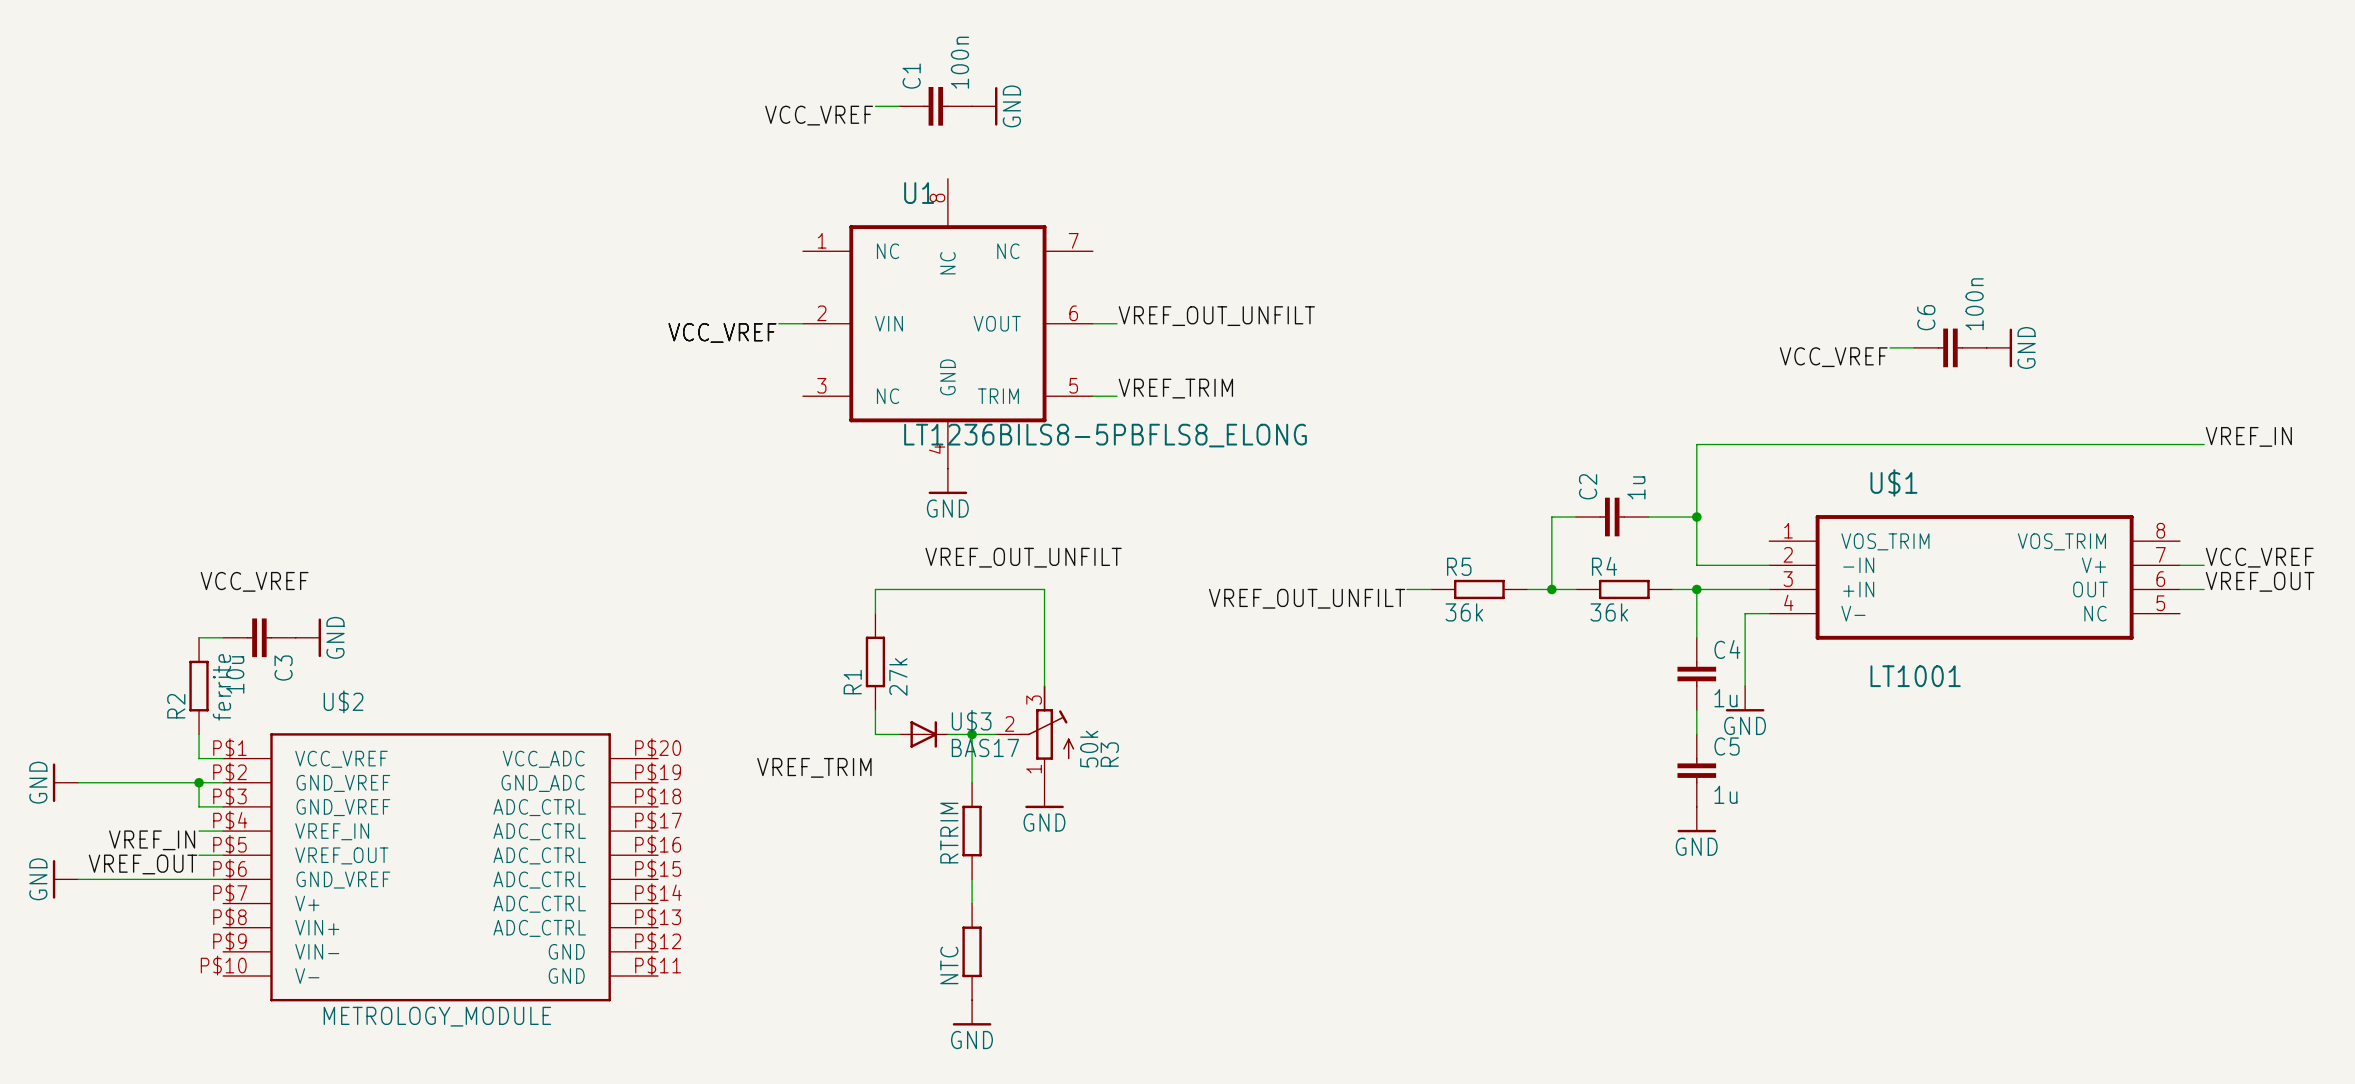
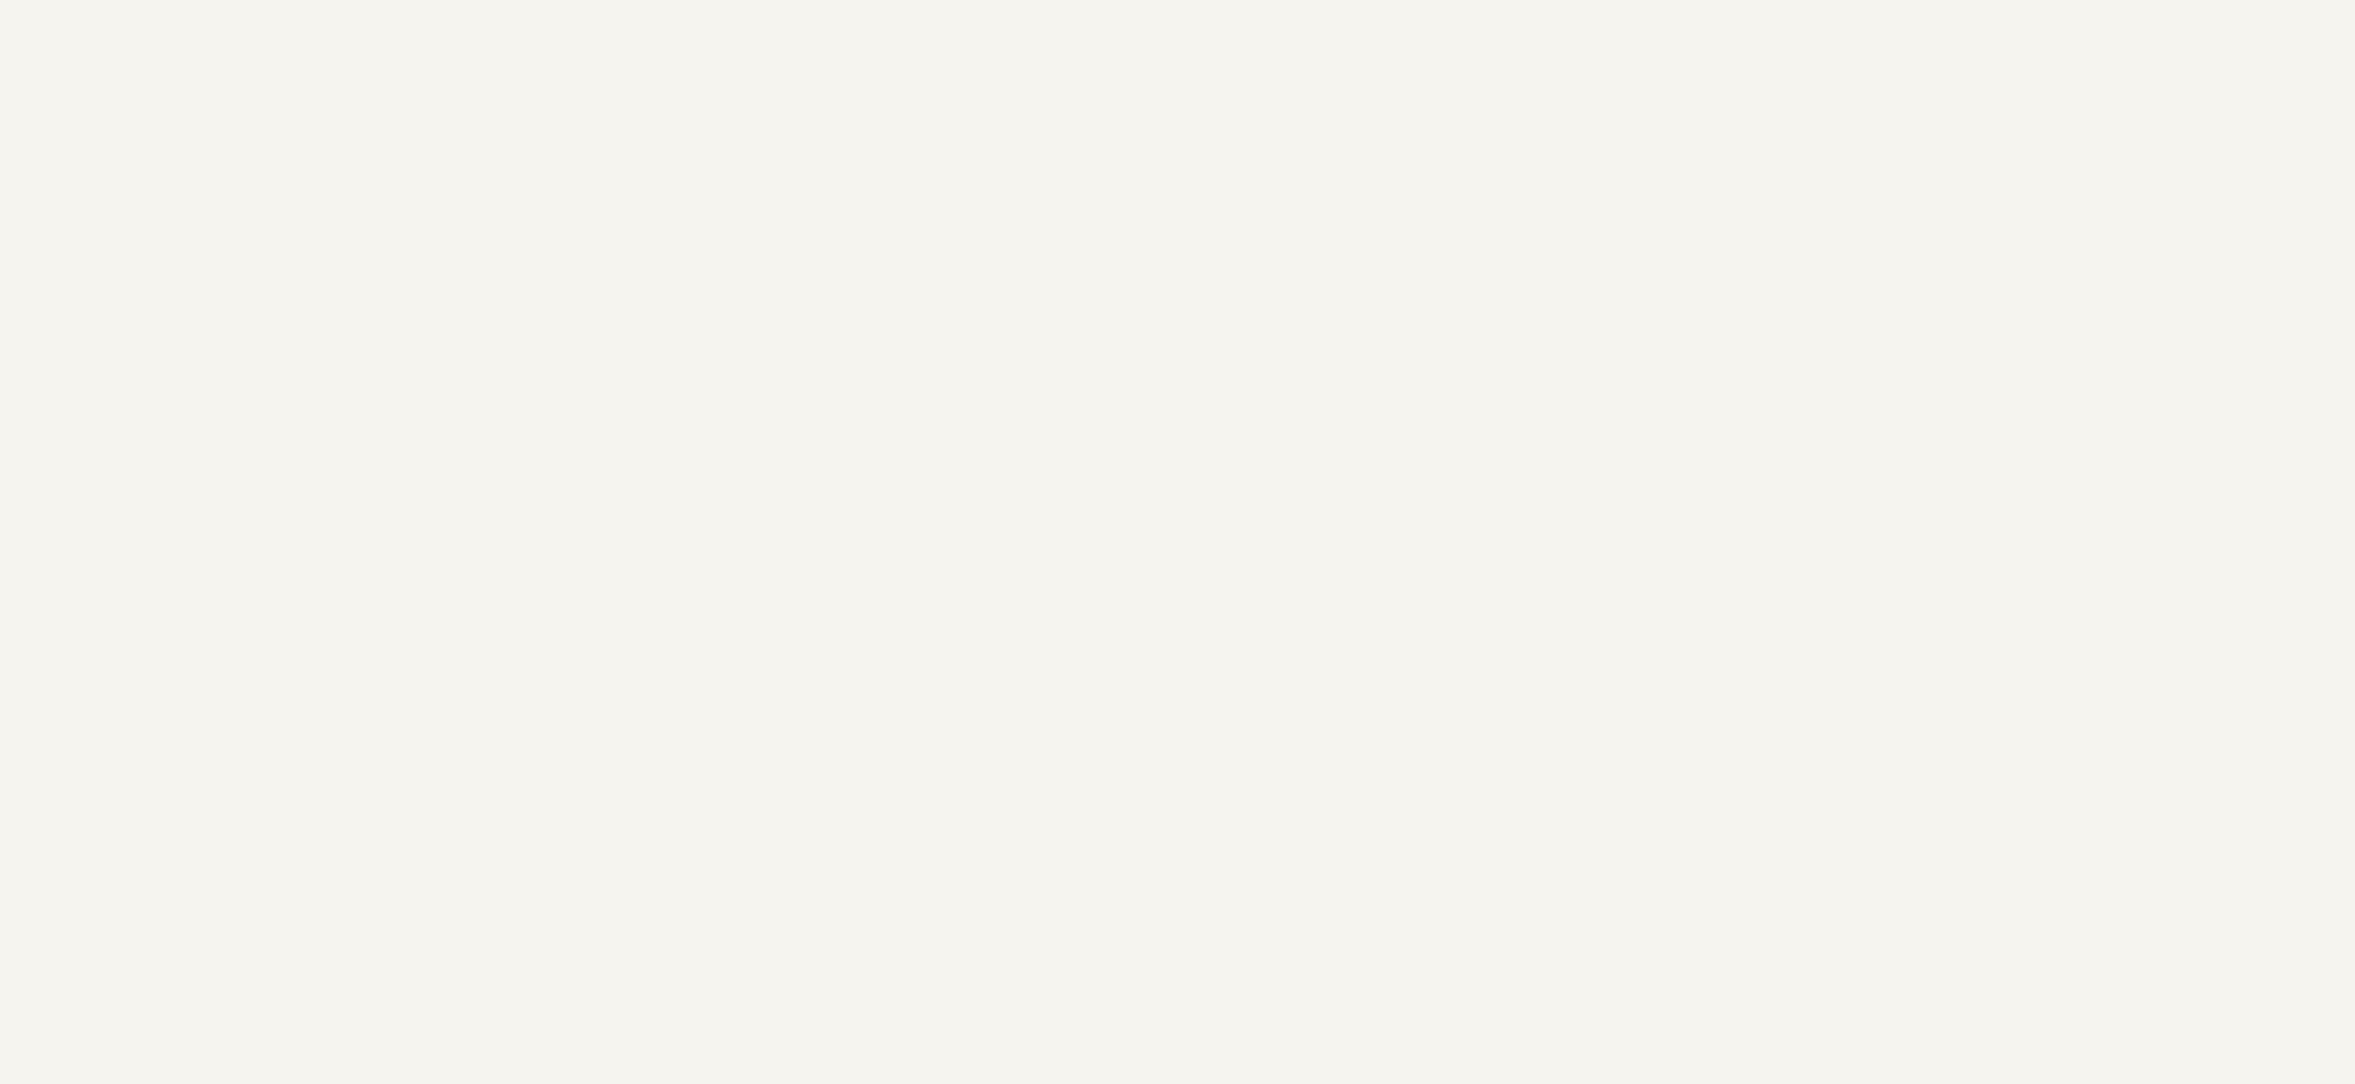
wire: (875, 106) (899, 106) -> none
C1: 100n (935, 106) -> none
power symbol: GND (984, 106) -> none
label: VCC_VREF (819, 115) -> none
label: VREF_OUT_UNFILT (1216, 316) -> none
wire: (778, 323) (802, 323) -> none
U1: LT1236BILS8-5PBFLS8_ELONG (947, 323) -> none
wire: (1092, 323) (1117, 323) -> none
label: VCC_VREF (722, 333) -> none
wire: (1890, 347) (1914, 347) -> none
C6: 100n (1950, 347) -> none
power symbol: GND (1999, 347) -> none
label: VCC_VREF (1833, 357) -> none
label: VREF_TRIM (1175, 388) -> none
wire: (1092, 396) (1117, 396) -> none
label: VREF_IN (2248, 436) -> none
wire: (2204, 444) (1696, 444) (1696, 565) (1769, 565) -> none
power symbol: GND (947, 481) -> none
wire: (1576, 517) (1551, 517) (1551, 589) -> none
C2: 1u (1612, 517) -> none
wire: (1648, 517) (1696, 517) -> none
junction: (1696, 517) -> none
label: VREF_OUT_UNFILT (1023, 557) -> none
label: VCC_VREF (2259, 557) -> none
wire: (2179, 565) (2204, 565) -> none
U$1: LT1001 (1974, 577) -> none
label: VCC_VREF (254, 581) -> none
label: VREF_OUT (2260, 581) -> none
wire: (1406, 589) (1431, 589) -> none
R5: 36k (1479, 589) -> none
wire: (1527, 589) (1576, 589) -> none
junction: (1551, 589) -> none
R4: 36k (1624, 589) -> none
wire: (1672, 589) (1769, 589) -> none
wire: (1696, 589) (1696, 637) -> none
junction: (1696, 589) -> none
wire: (2179, 589) (2204, 589) -> none
label: VREF_OUT_UNFILT (1307, 598) -> none
wire: (875, 613) (875, 589) (1044, 589) (1044, 686) -> none
wire: (1769, 613) (1745, 613) (1745, 686) -> none
wire: (199, 637) (223, 637) -> none
C3: 10u (259, 637) -> none
power symbol: GND (308, 637) -> none
R1: 27k (875, 661) -> none
C4: 1u (1696, 674) -> none
R2: ferrite (199, 686) -> none
power symbol: GND (1745, 698) -> none
wire: (875, 710) (875, 734) (899, 734) -> none
wire: (1696, 710) (1696, 734) -> none
wire: (199, 734) (199, 758) (223, 758) -> none
U$3: BAS17 (923, 734) -> none
wire: (947, 734) (996, 734) -> none
wire: (972, 734) (972, 782) -> none
junction: (972, 734) -> none
R3: 50k (1035, 734) -> none
label: VREF_TRIM (814, 767) -> none
C5: 1u (1696, 770) -> none
power symbol: GND (65, 782) -> none
wire: (78, 782) (223, 782) -> none
wire: (199, 782) (199, 806) (223, 806) -> none
junction: (199, 782) -> none
power symbol: GND (1044, 795) -> none
power symbol: GND (1696, 819) -> none
wire: (199, 831) (223, 831) -> none
RTRIM: (972, 831) -> none
label: VREF_IN (152, 840) -> none
wire: (199, 855) (223, 855) -> none
label: VREF_OUT (143, 864) -> none
U$2: METROLOGY_MODULE (440, 867) -> none
power symbol: GND (65, 879) -> none
wire: (78, 879) (223, 879) -> none
wire: (972, 879) (972, 903) -> none
NTC: (972, 951) -> none
power symbol: GND (972, 1012) -> none

